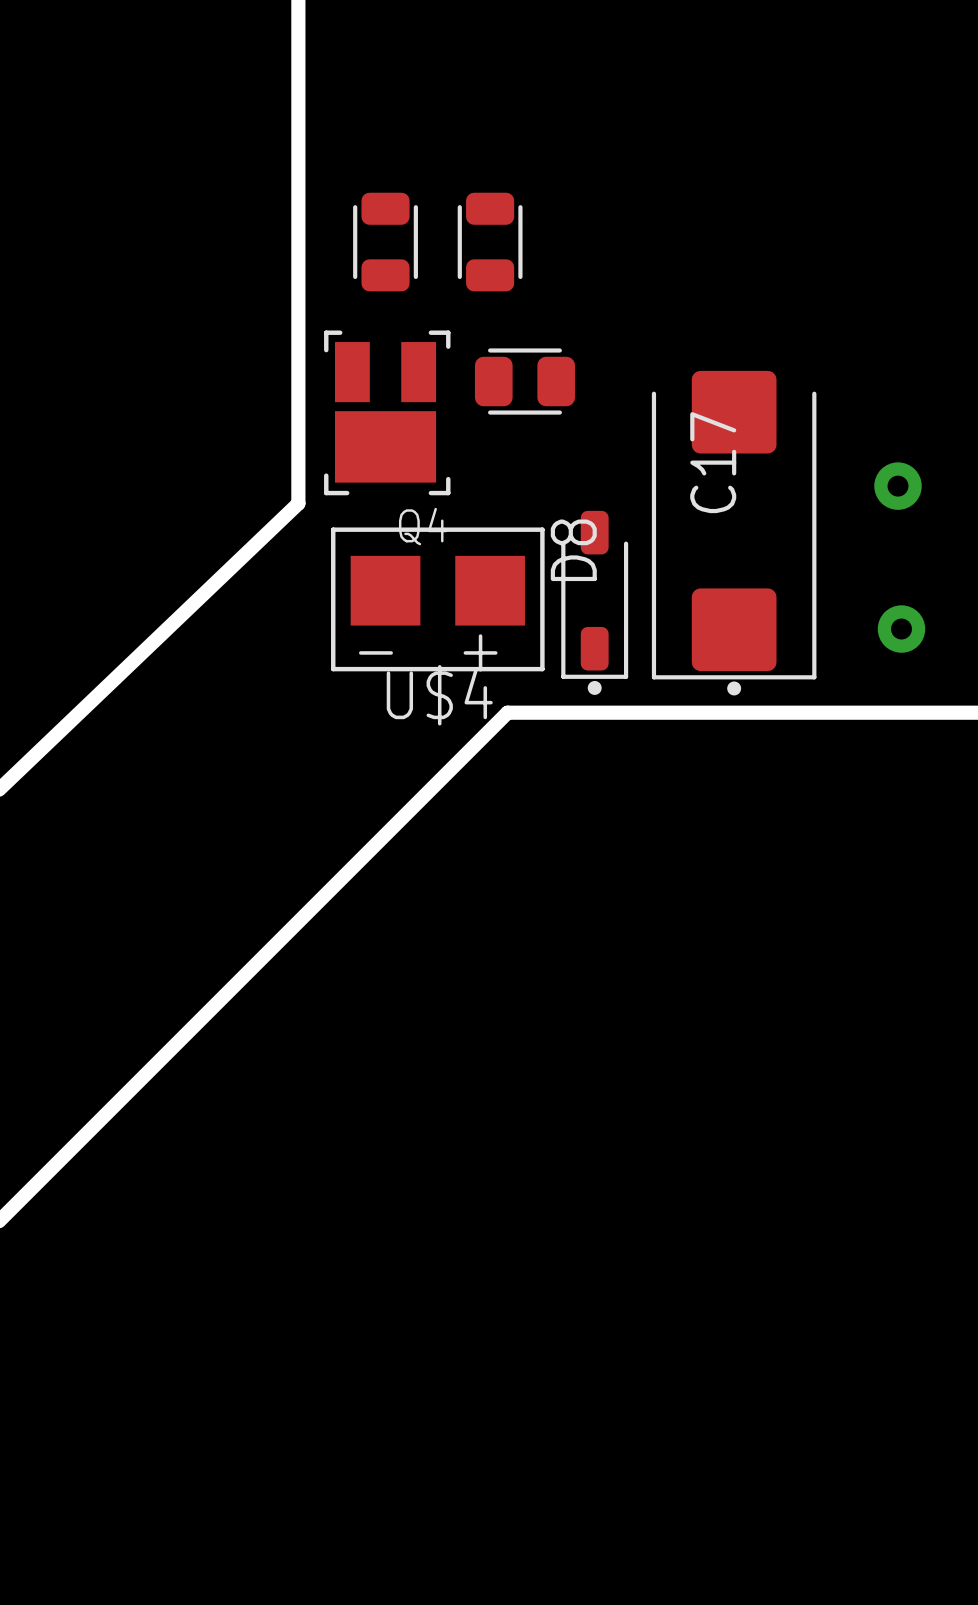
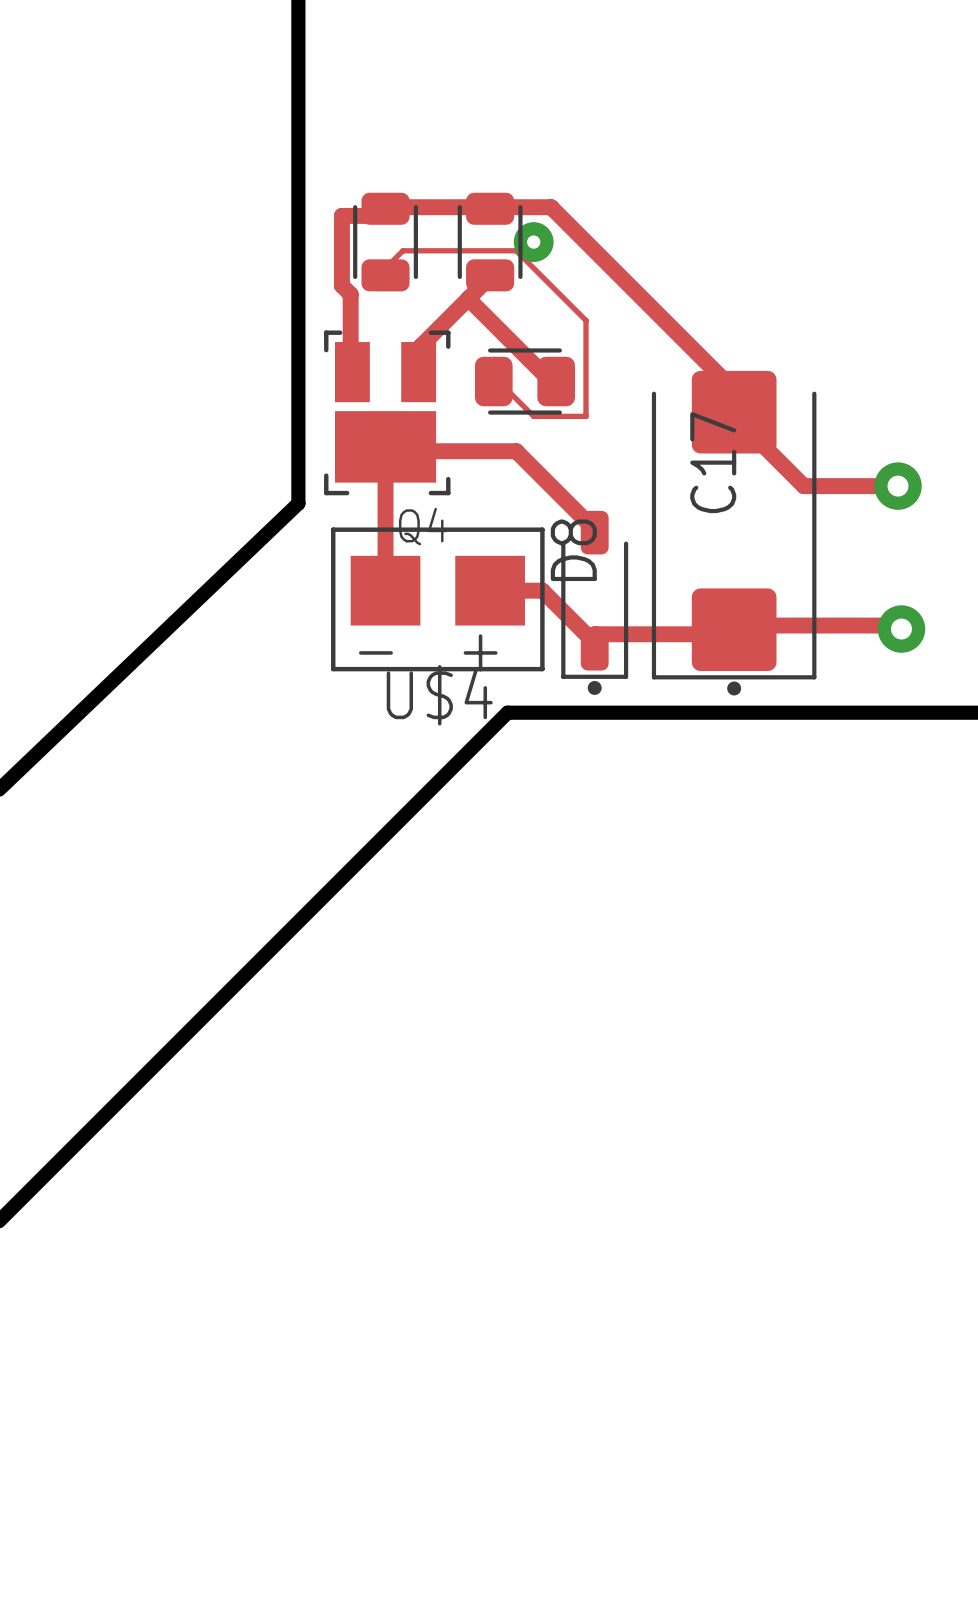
via: none -> (533, 242)
track: none -> (516, 250) (402, 250) (385, 268) (385, 275)
track: none -> (516, 250) (585, 320) (585, 416) (533, 416) (498, 381) (493, 381)
track: none -> (490, 275) (420, 346) (418, 372)
track: none -> (468, 298) (551, 381) (556, 381)
track: none -> (352, 372) (350, 364) (350, 294) (341, 285) (341, 215) (385, 215) (385, 207) (551, 207) (734, 390) (734, 416) (803, 486) (898, 486)
track: none -> (385, 446) (385, 590)
track: none -> (385, 451) (516, 451) (594, 529) (594, 532)
track: none -> (490, 590) (542, 590) (594, 642)
track: none -> (901, 629) (899, 625) (734, 625) (734, 634) (594, 634) (594, 648)

